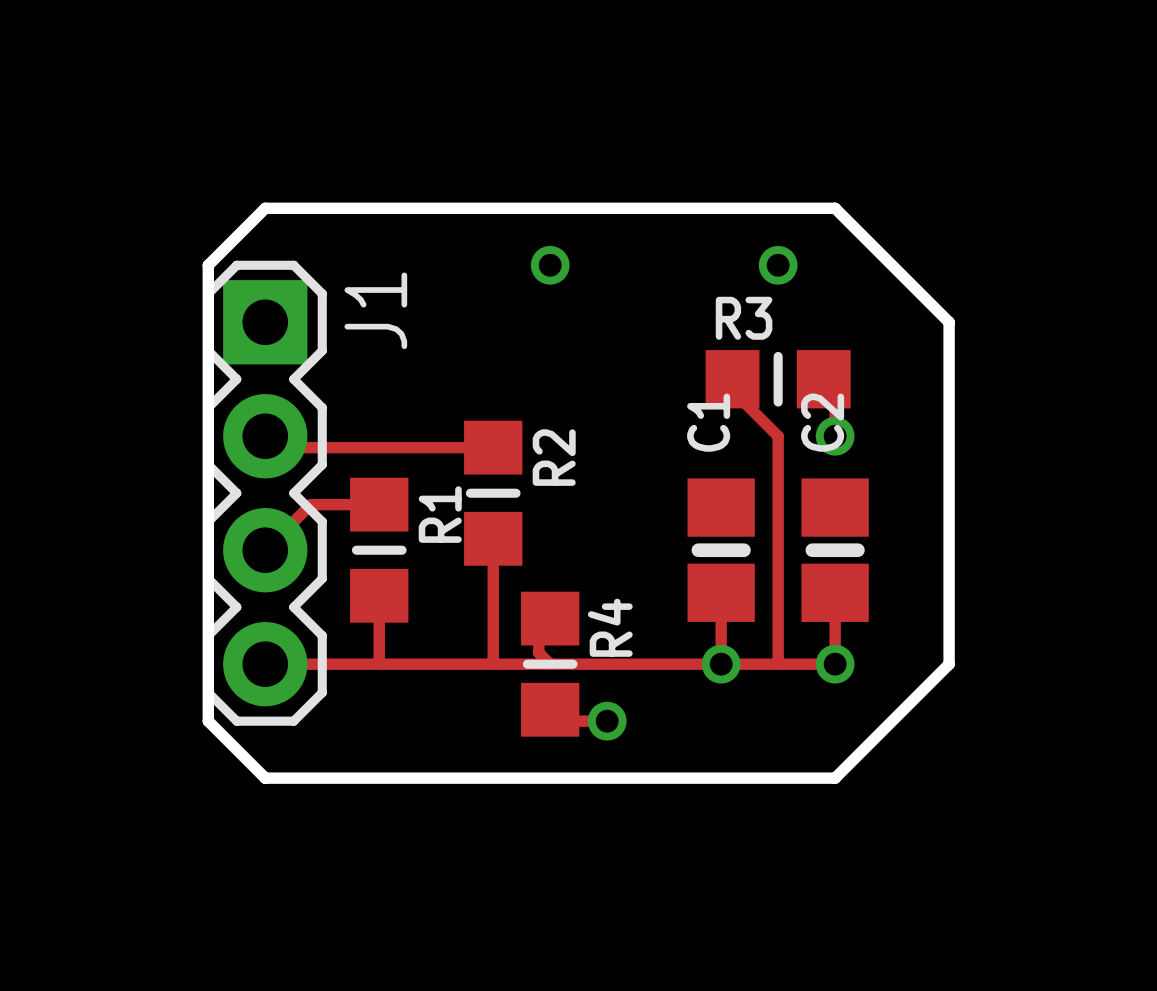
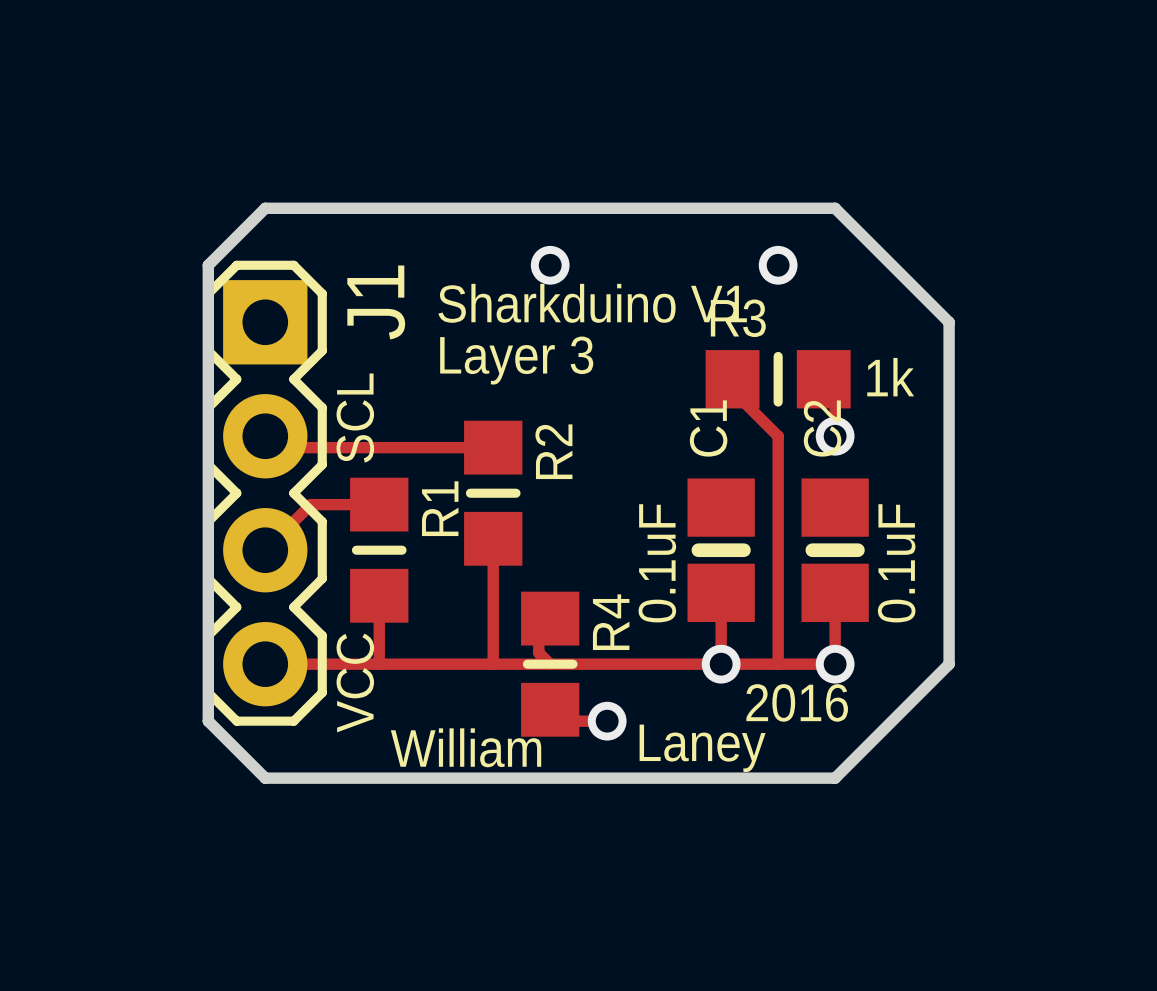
text: none -> Sharkduino V1 (592, 303)
text: none -> Layer 3 (516, 360)
text: none -> 1k (890, 377)
text: none -> SCL (355, 418)
text: none -> 0.1uF (657, 563)
text: none -> 0.1uF (896, 563)
text: none -> VCC (355, 683)
text: none -> 2016 (797, 702)
text: none -> William (466, 747)
text: none -> Laney (702, 748)

